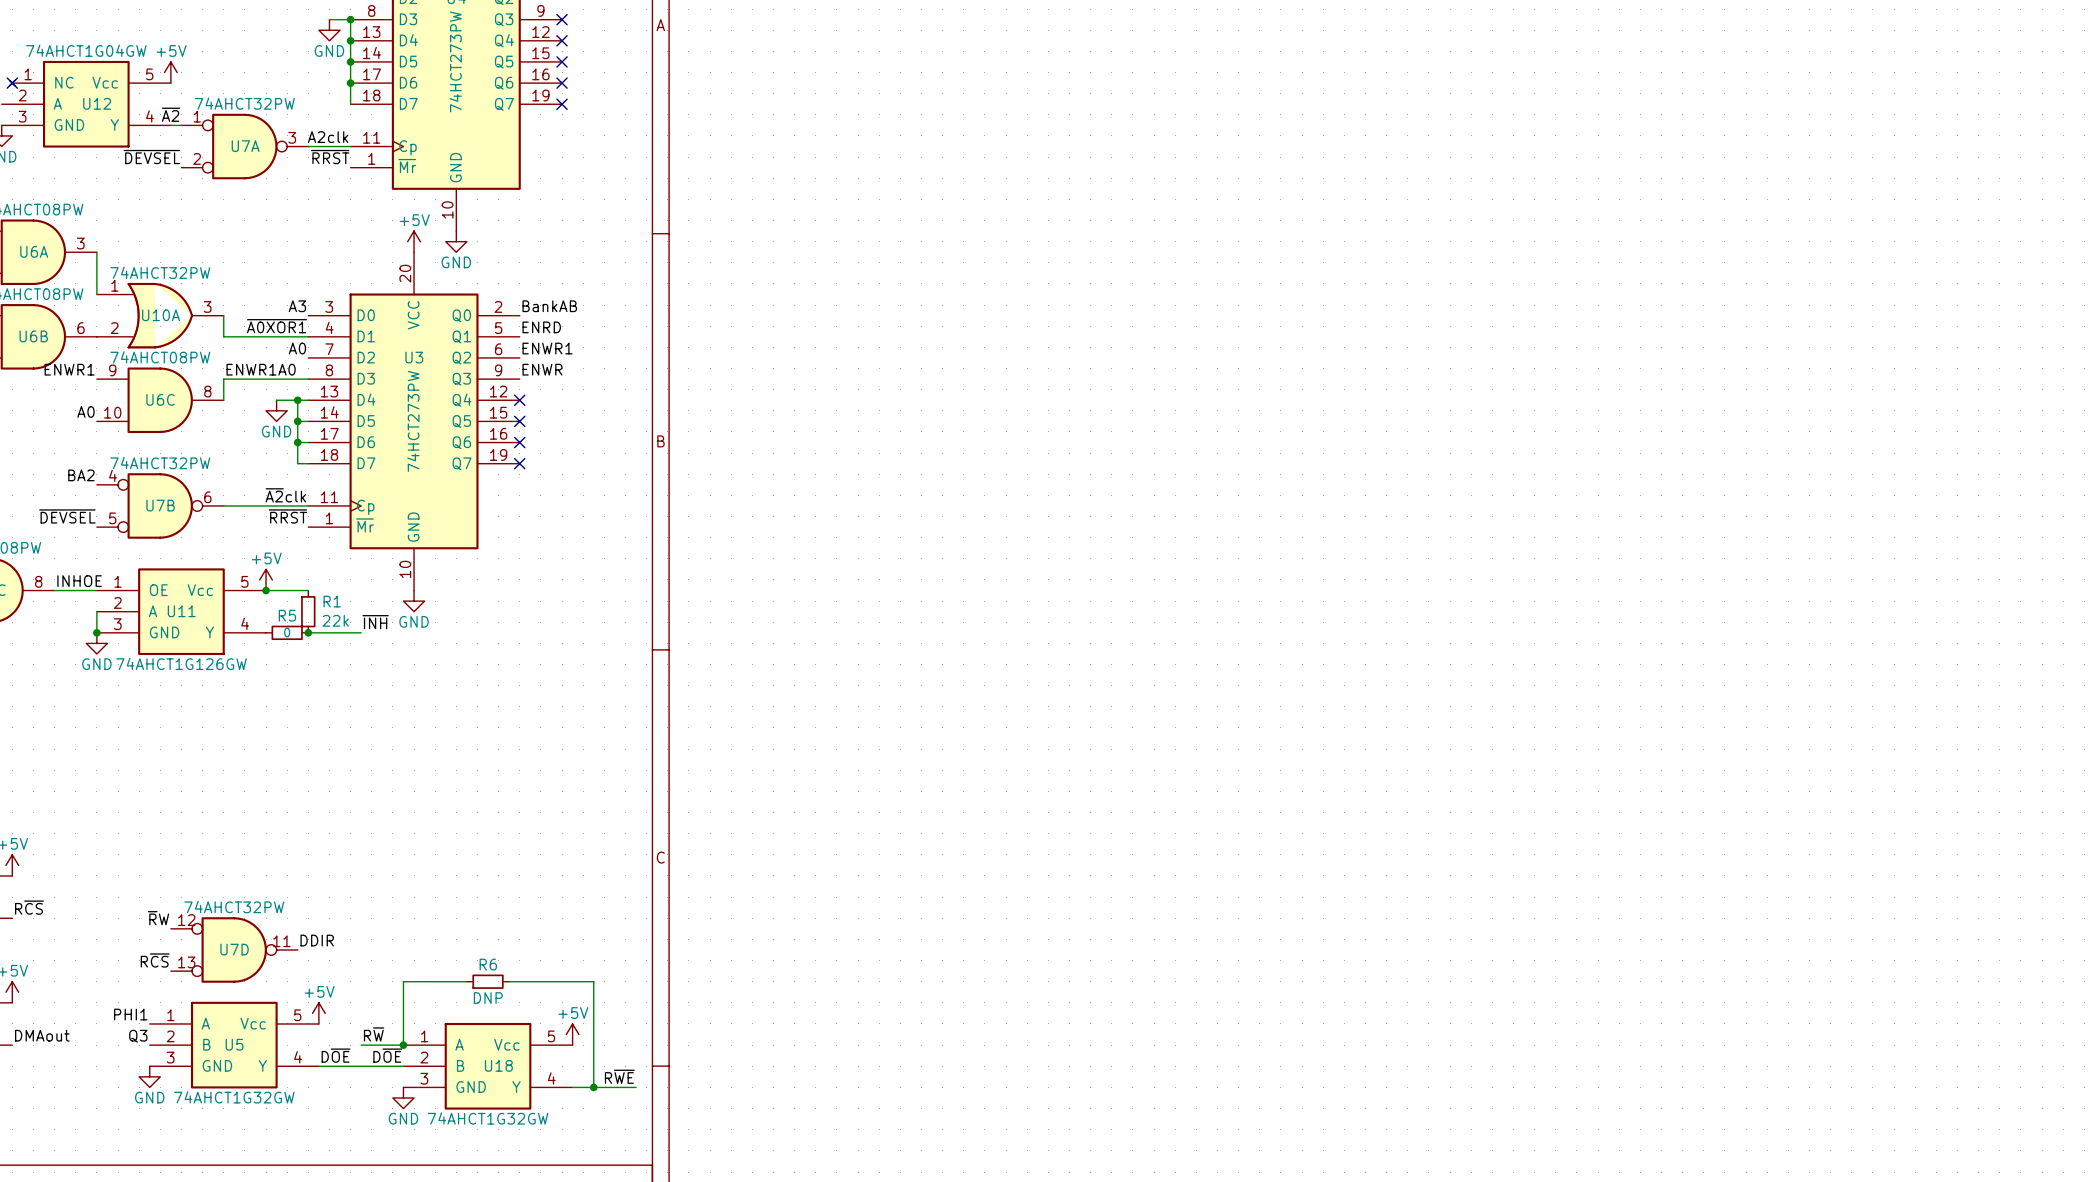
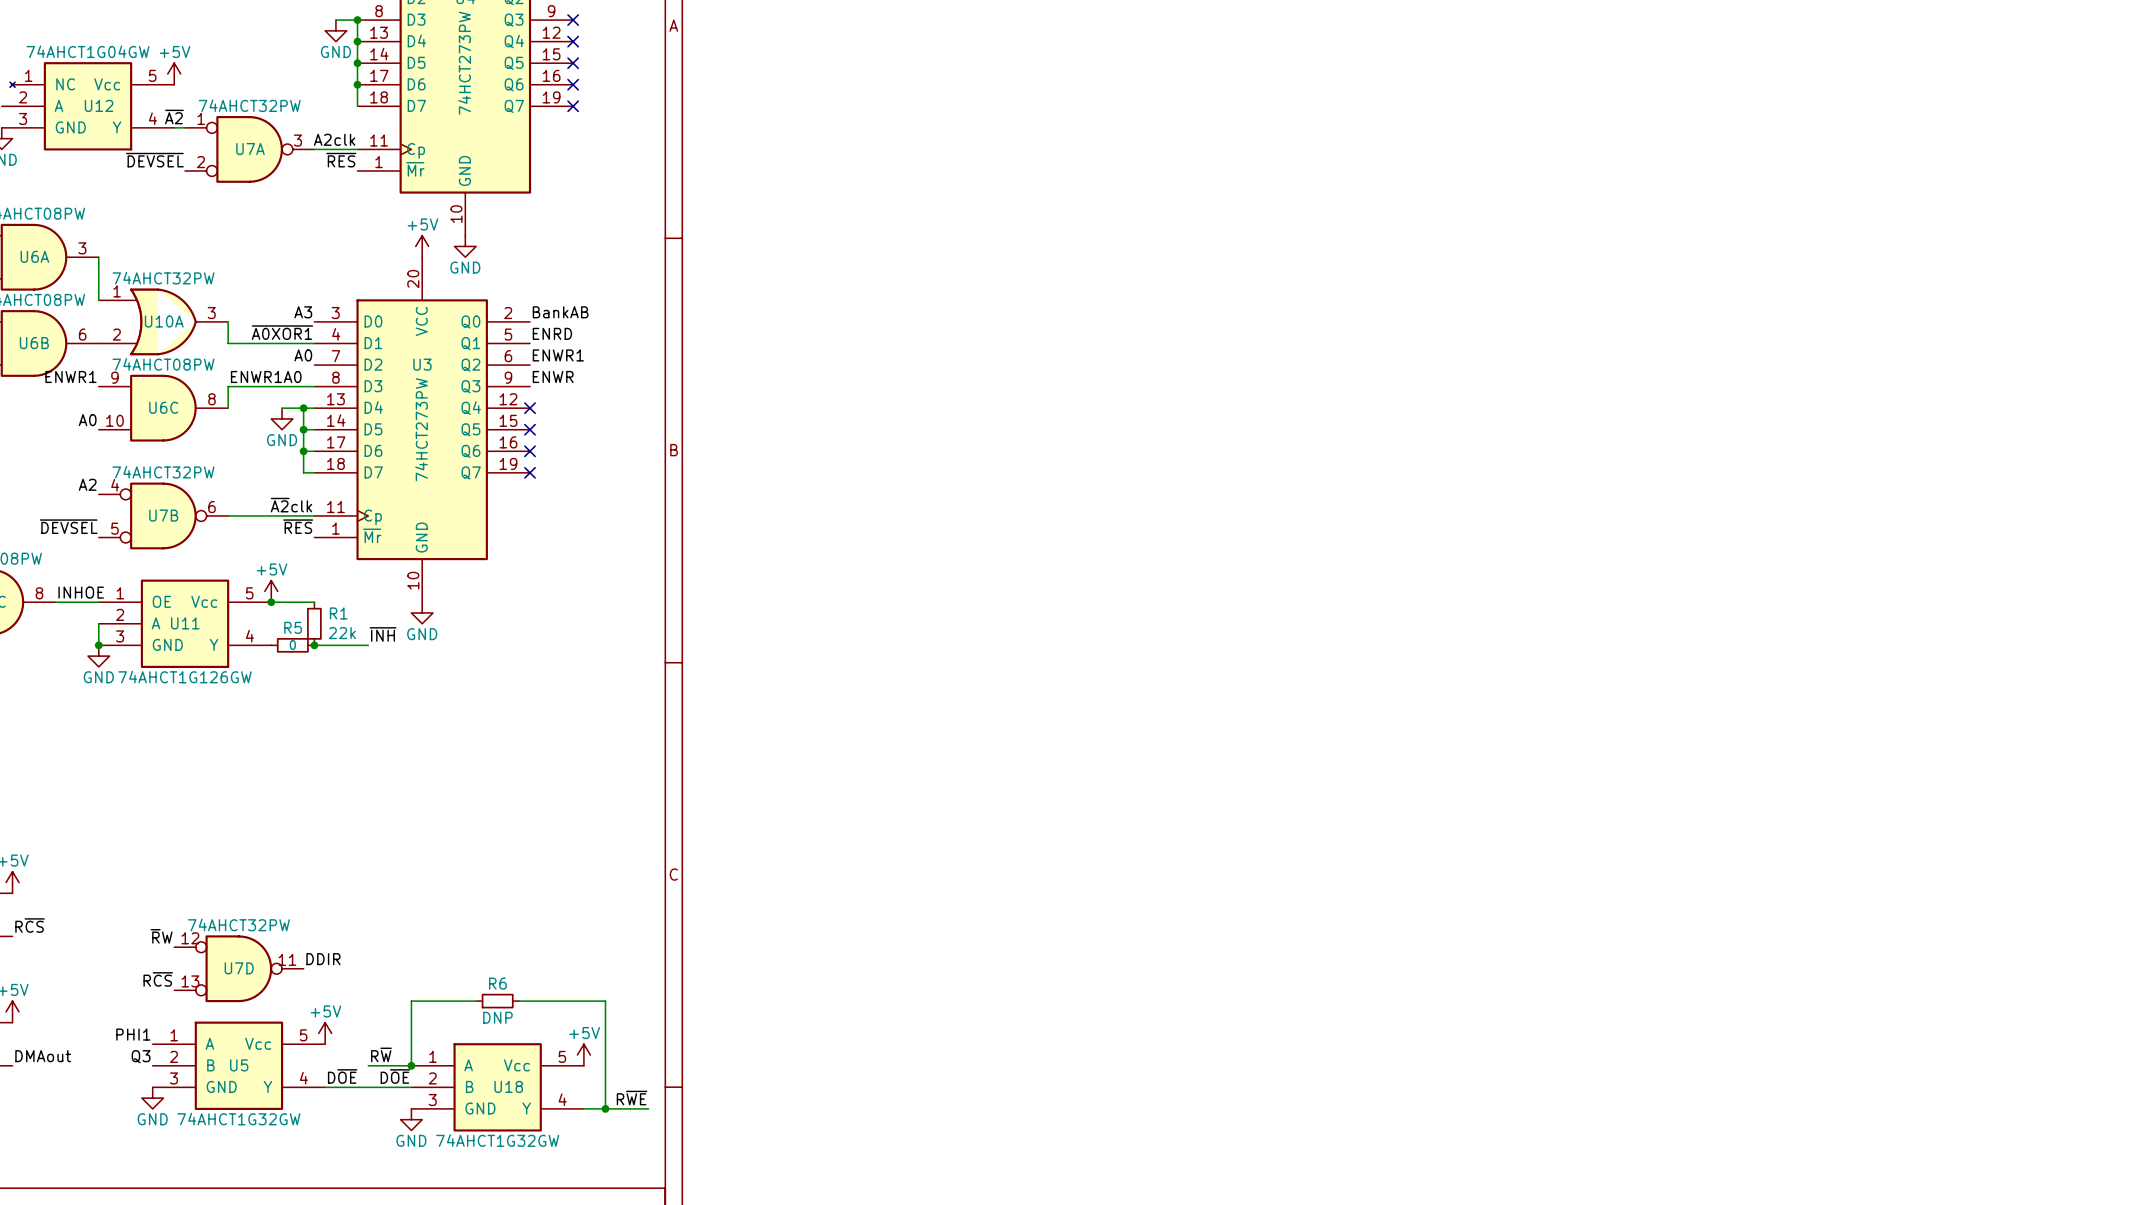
no-connect mark: (12, 83) -> none
label: ~{RRST} (330, 157) -> ~{RES} (341, 160)
label: BA2 (81, 475) -> A2 (87, 484)
label: ~{RRST} (287, 516) -> ~{RES} (298, 526)

